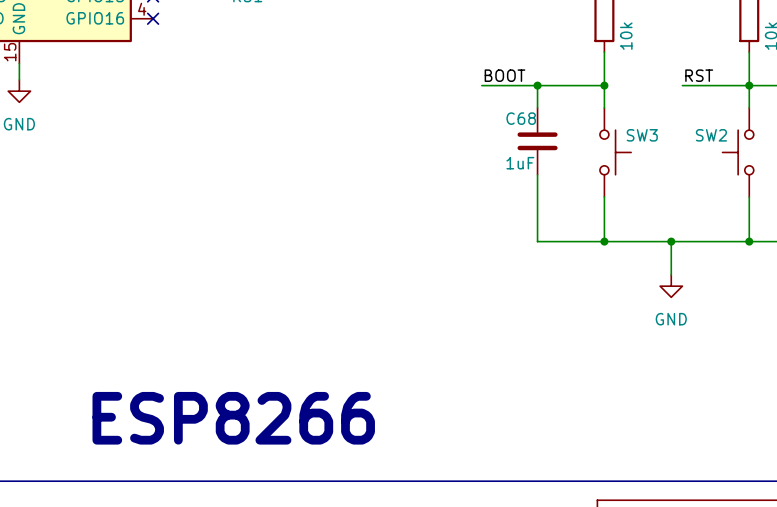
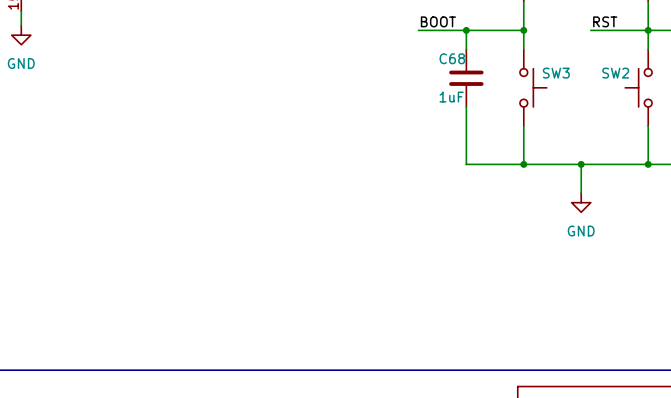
text: ESP8266 (233, 418) -> none

